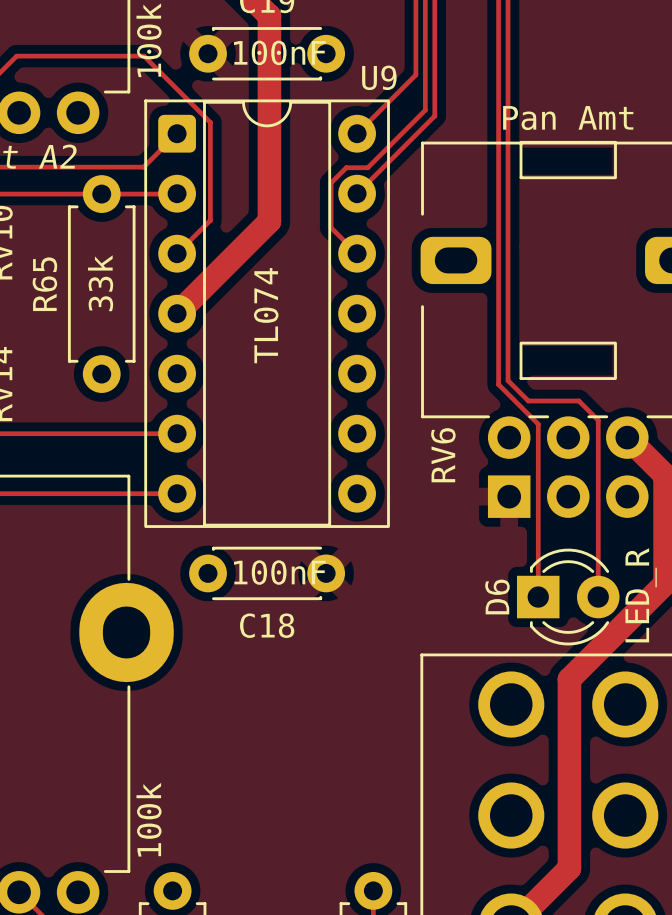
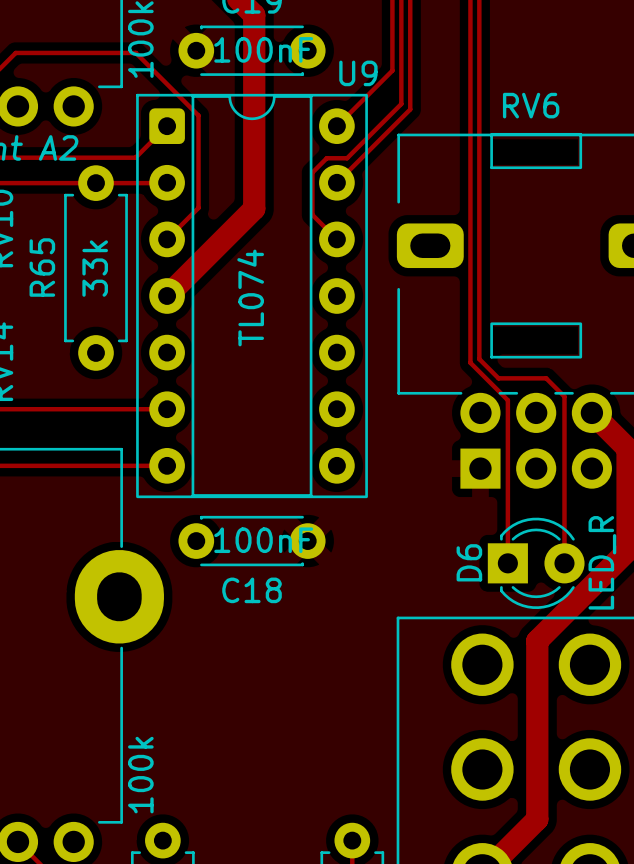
RV6 text: Pan Amt (568, 118) -> none
RV6 name rotation: 0° (443, 455) -> 90° clockwise (531, 105)
RV6 name position: RV6 (443, 455) -> RV6 (531, 105)

